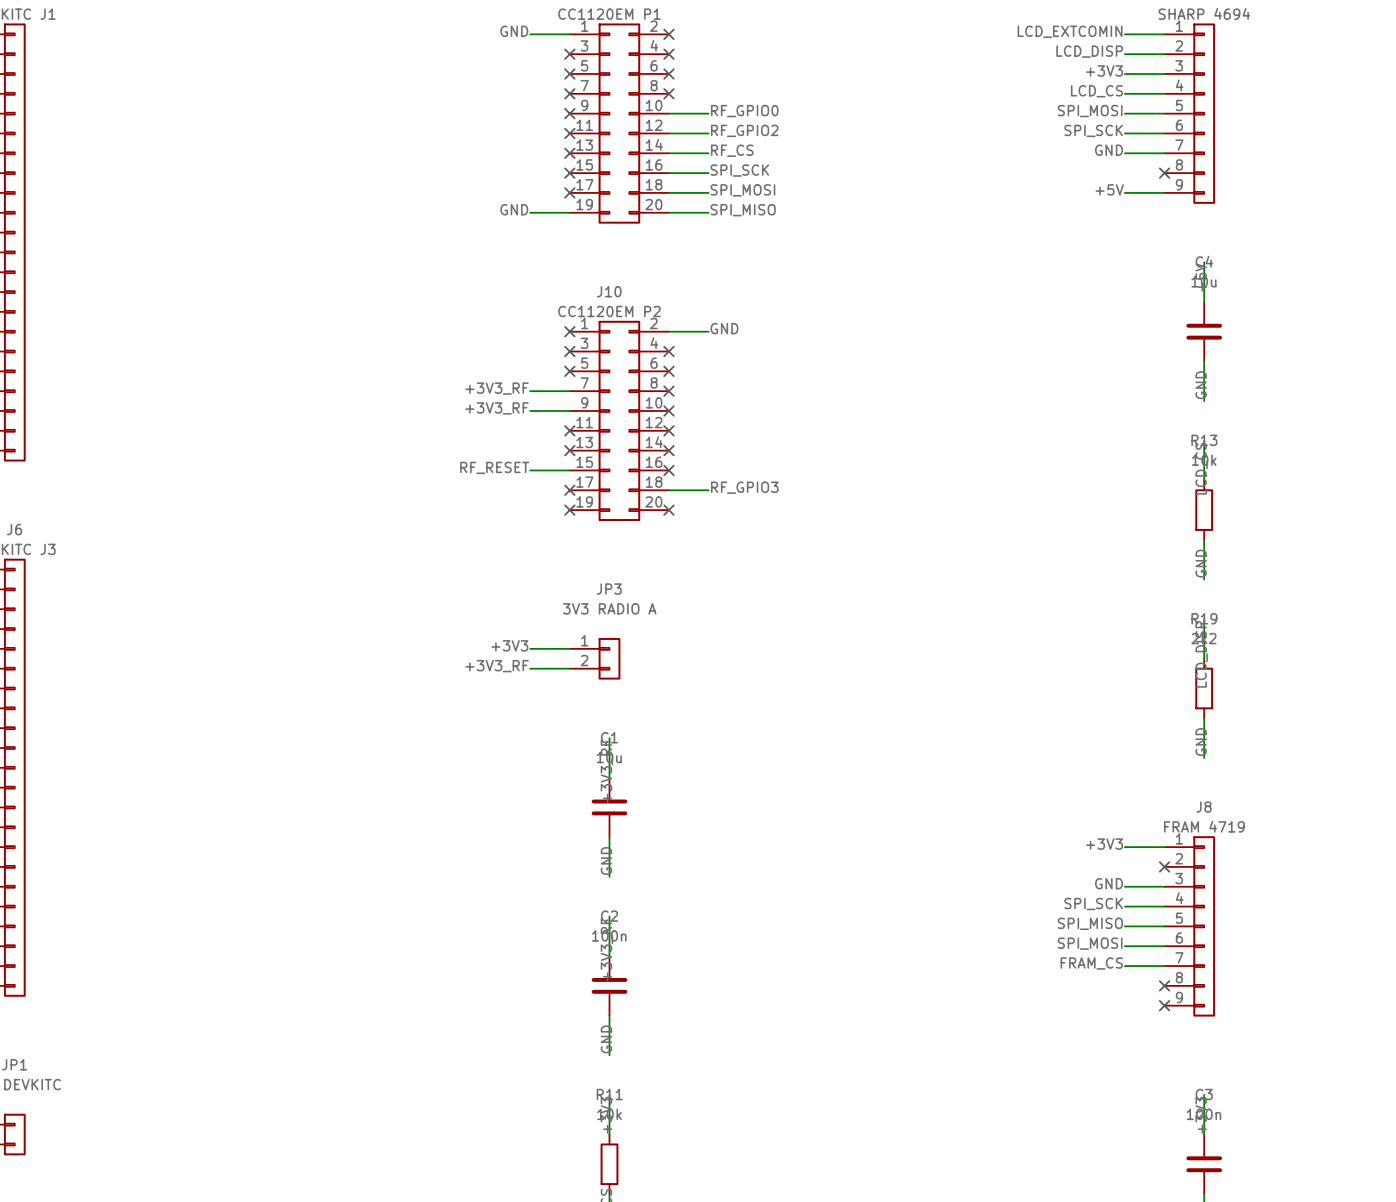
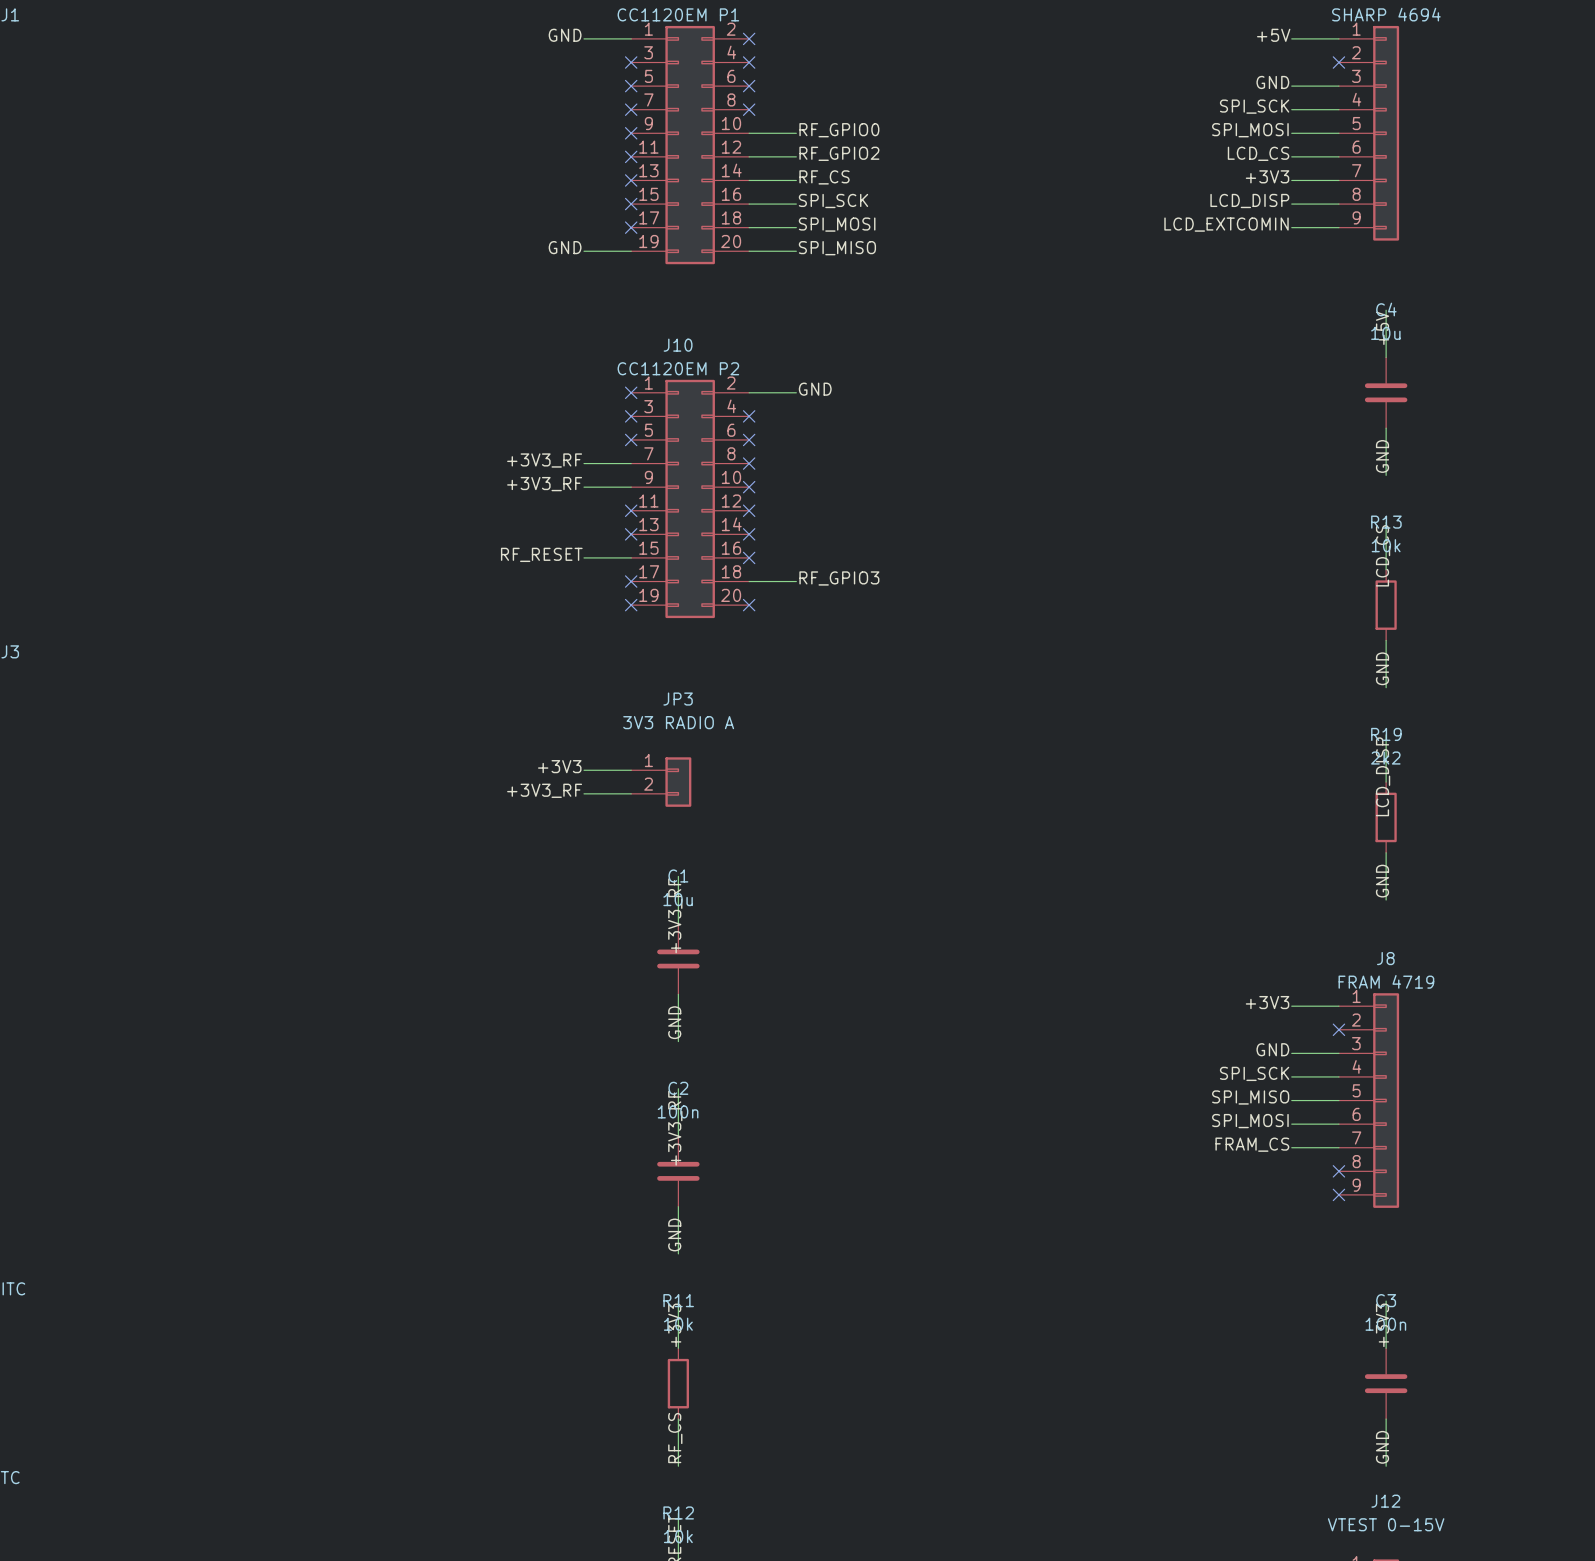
label: LCD_EXTCOMIN (1070, 31) -> +5V (1273, 35)
label position: LCD_DISP (1089, 51) -> LCD_DISP (1249, 200)
wire: (1124, 54) (1164, 54) -> (1291, 204) (1338, 204)
no-connect mark: none -> (1338, 62)
label: +3V3 (1104, 70) -> GND (1272, 82)
label: LCD_CS (1096, 91) -> SPI_SCK (1254, 106)
label: SPI_SCK (1093, 130) -> LCD_CS (1258, 153)
label: GND (1109, 150) -> +3V3 (1267, 176)
no-connect mark: (1164, 173) -> none
label: +5V (1109, 189) -> LCD_EXTCOMIN (1226, 224)

